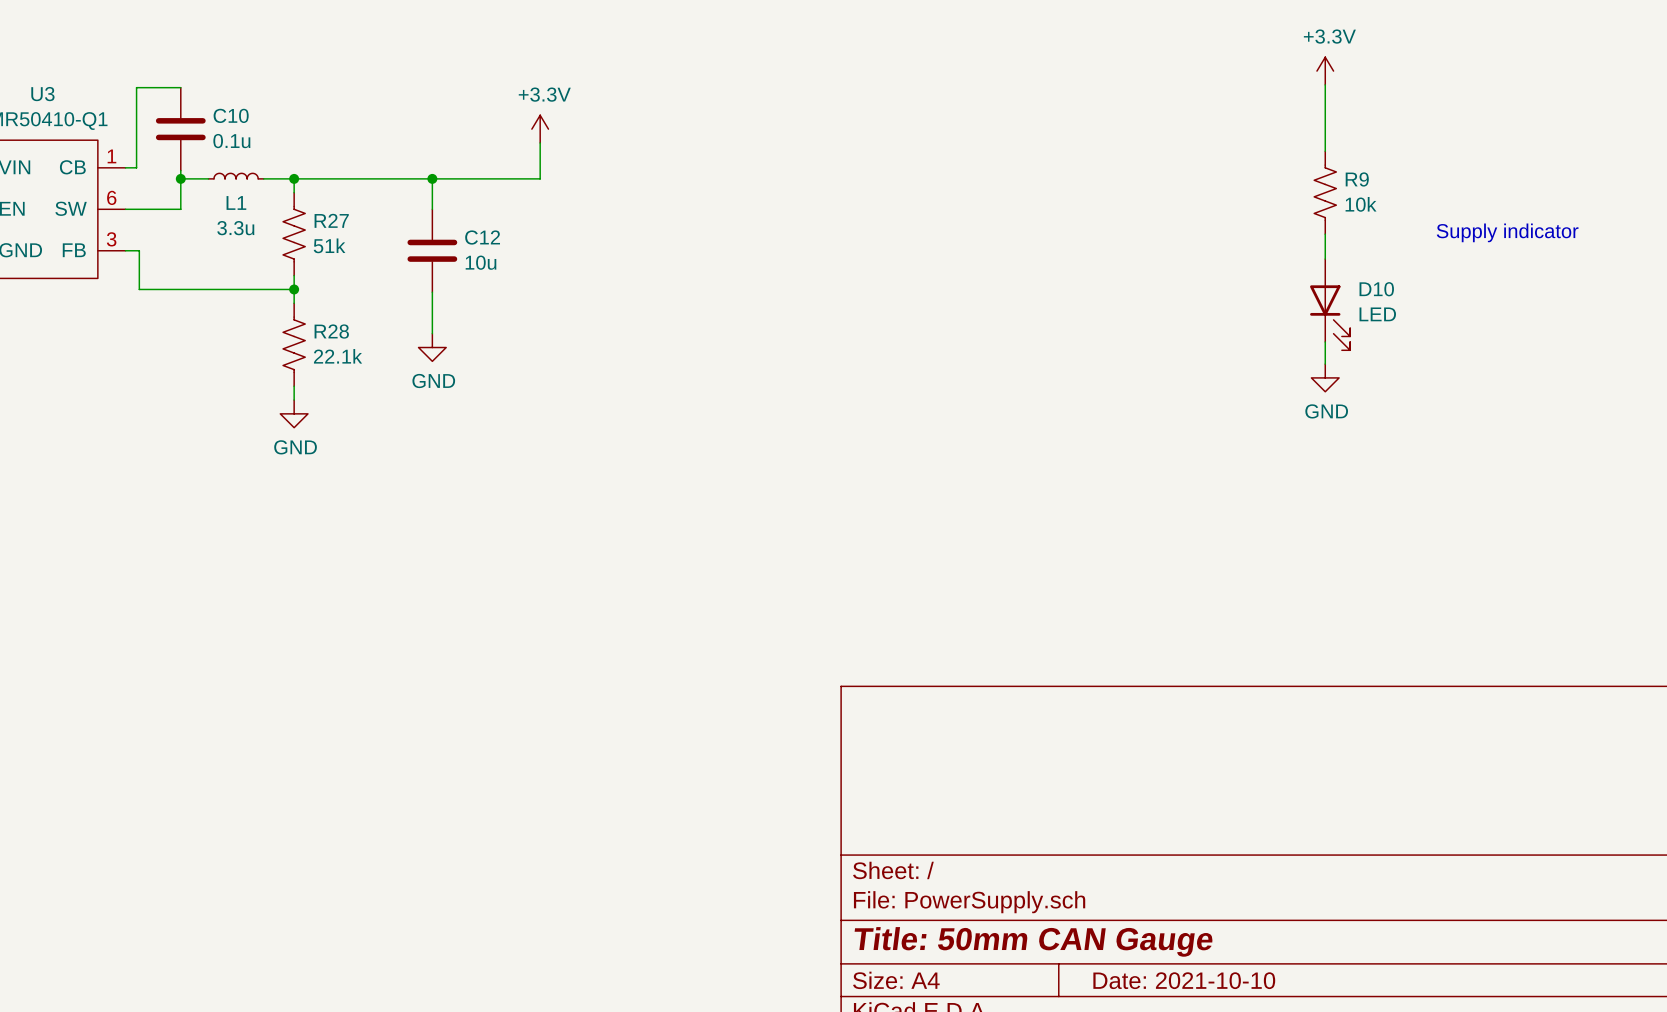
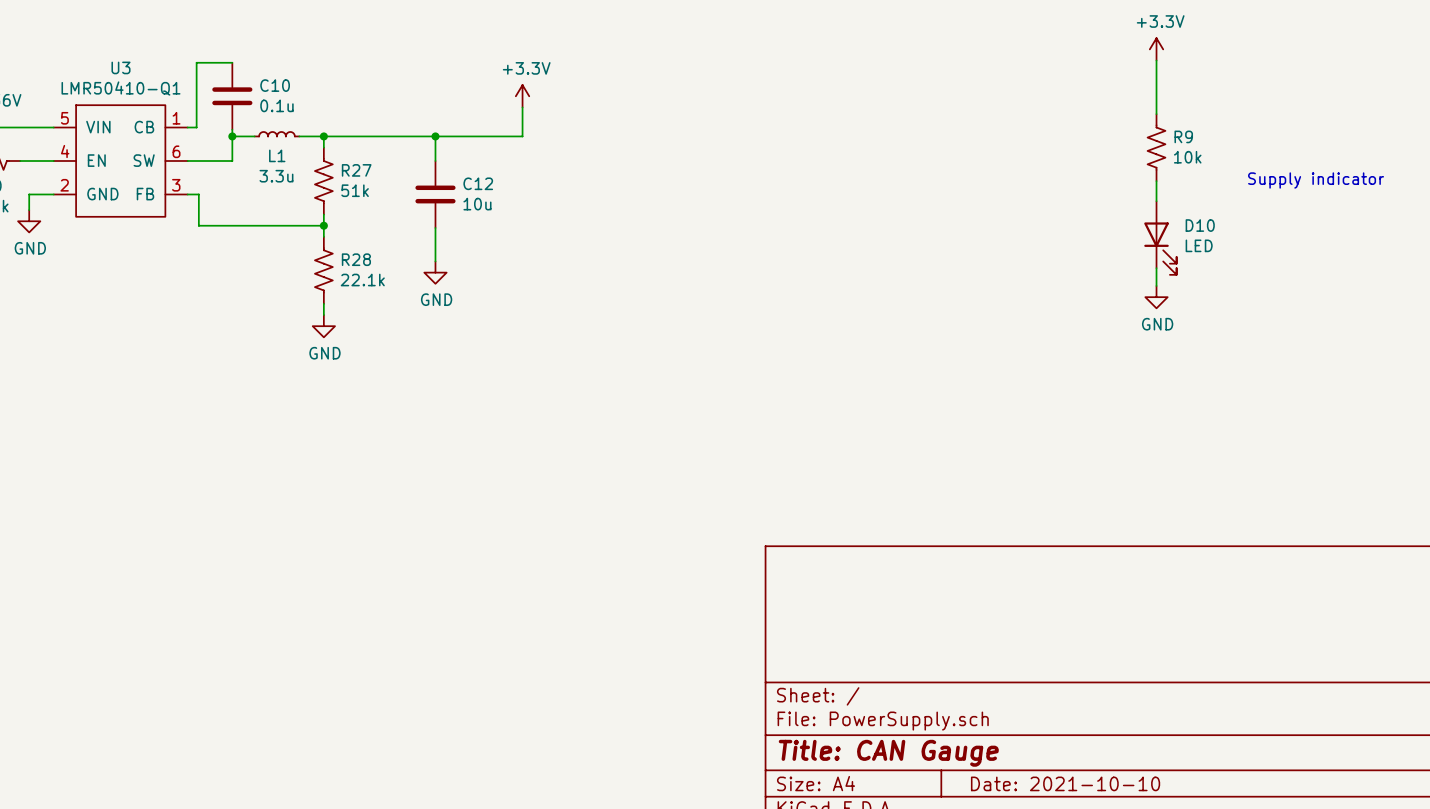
title block: Title: 50mm CAN Gauge (1033, 941) -> Title: CAN Gauge (888, 753)

